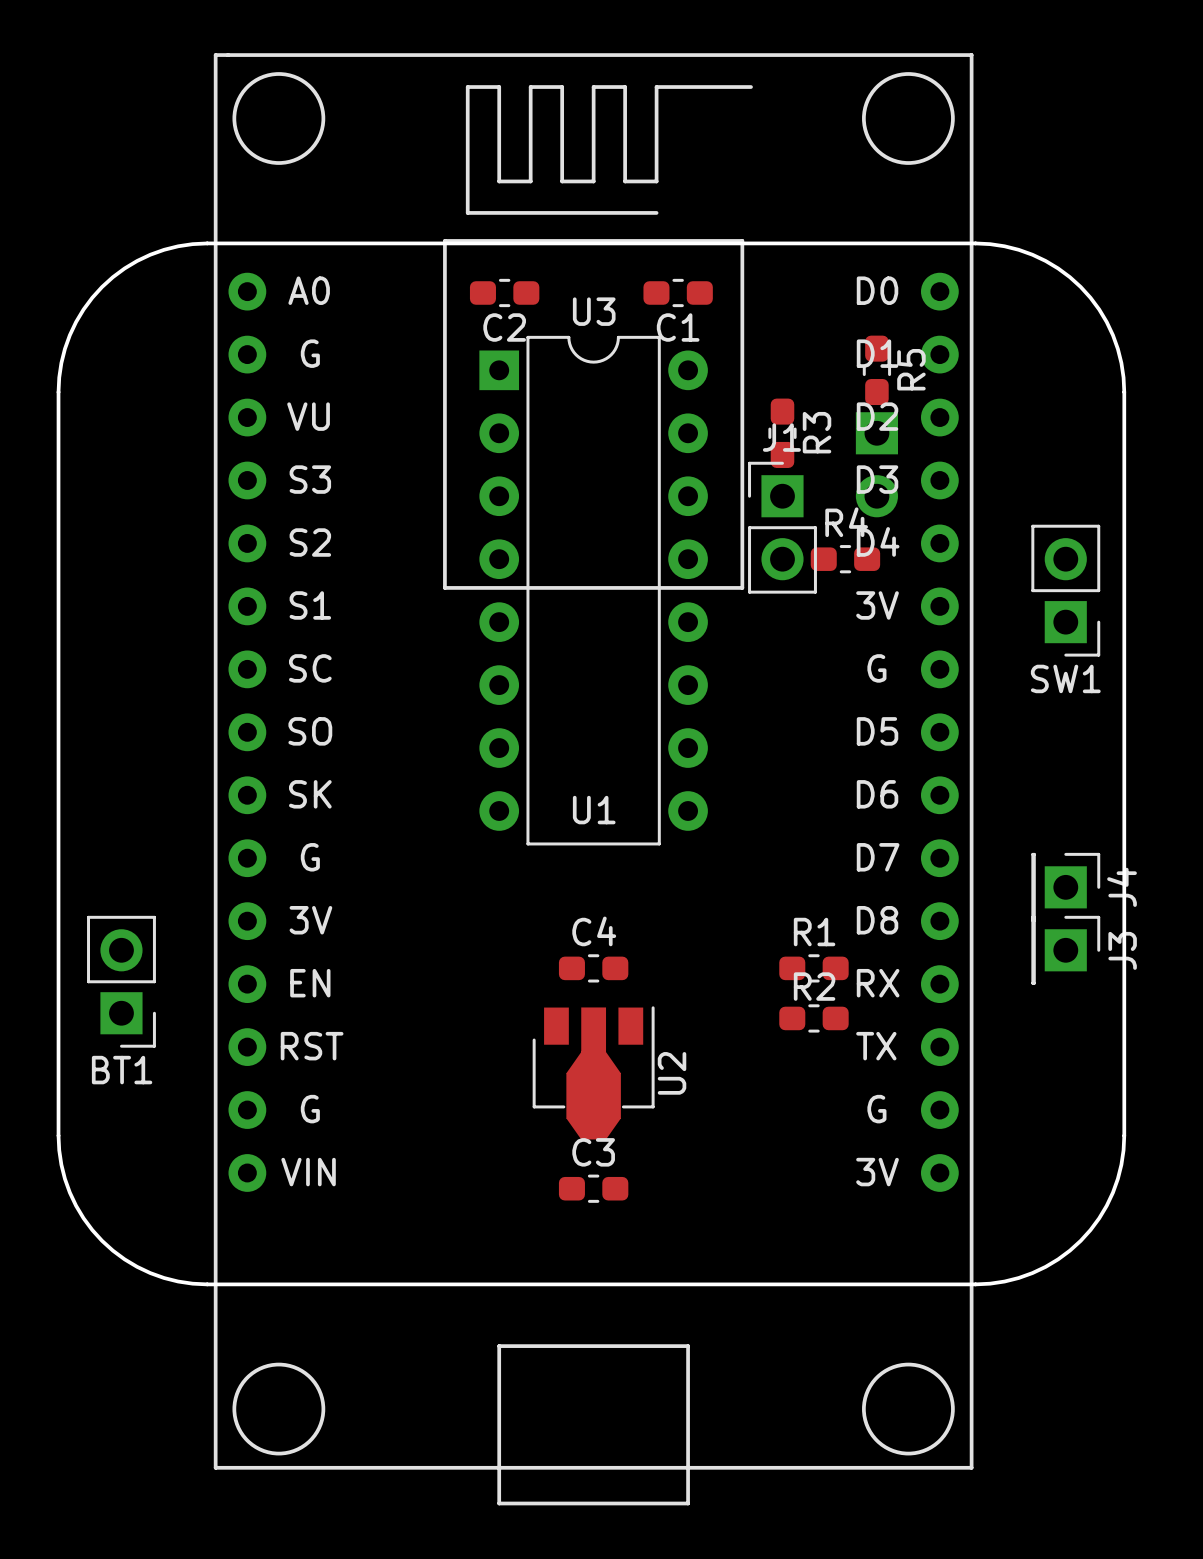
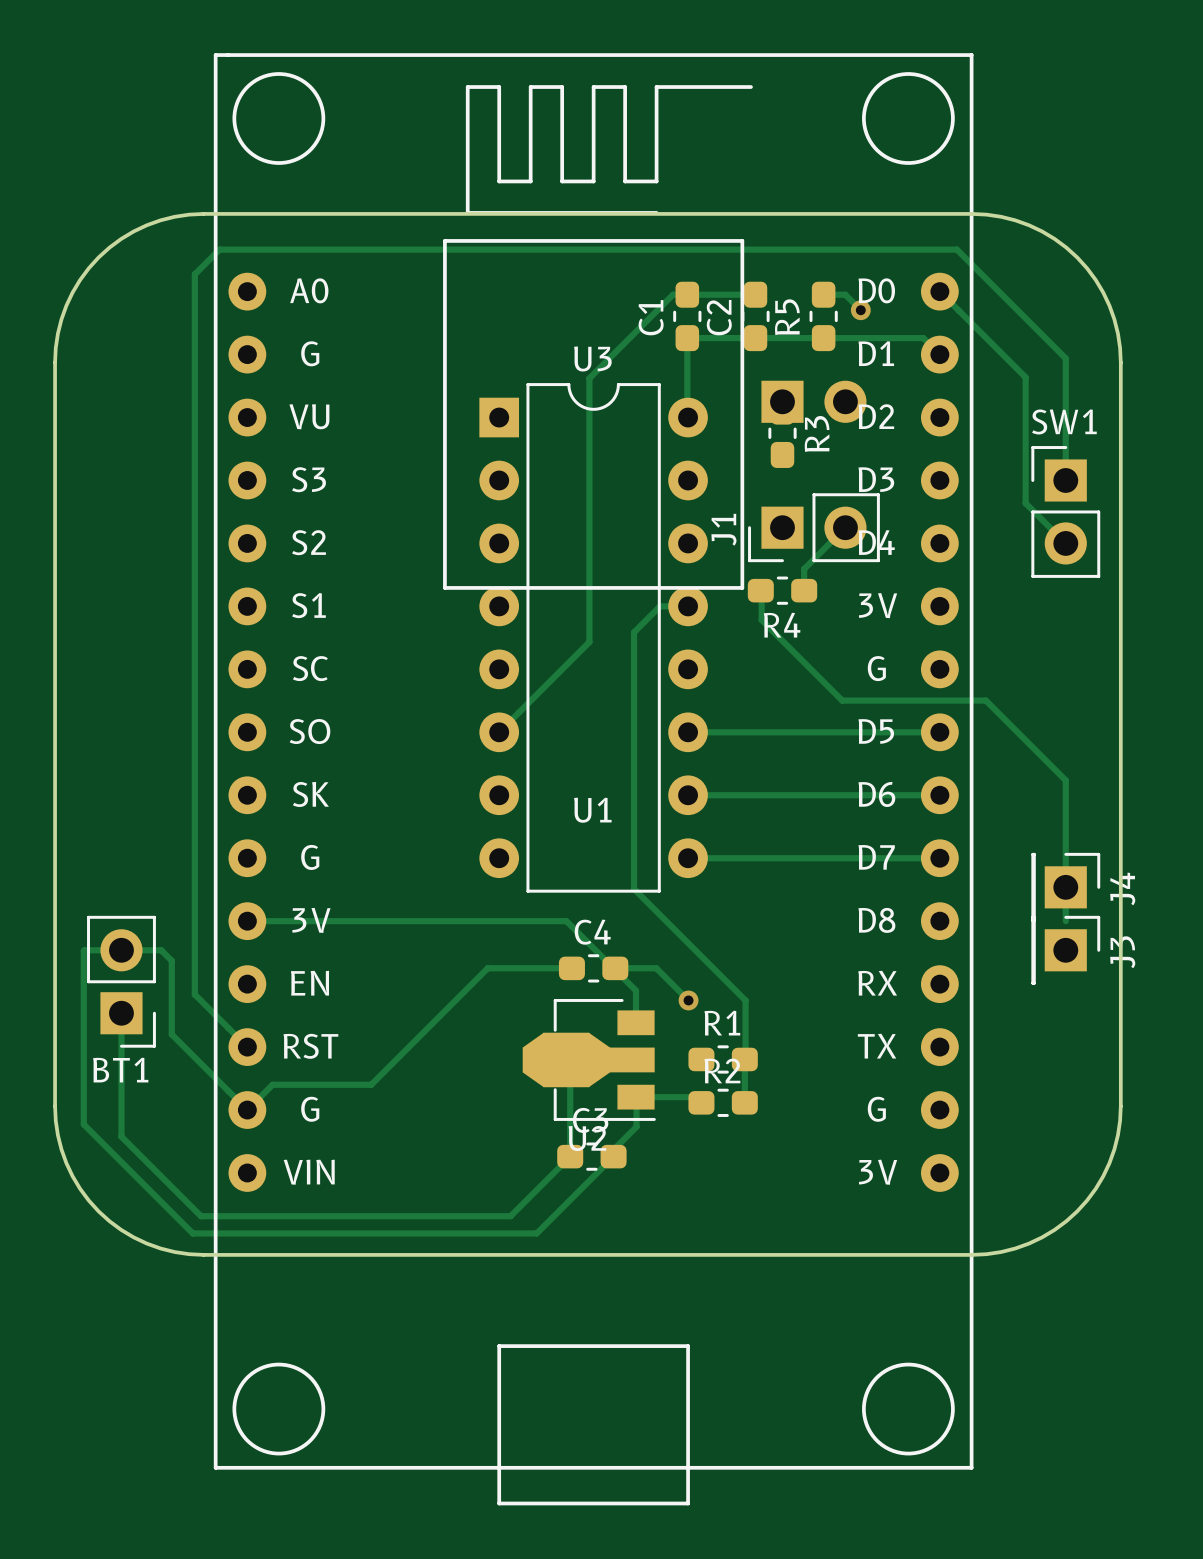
board edge: (207, 243) (990, 244) (1018, 249) (1045, 260) (1069, 277) (1090, 297) (1112, 335) (1121, 363) (1124, 392) (1124, 1135) (1121, 1164) (1112, 1192) (1090, 1230) (1069, 1250) (1045, 1266) (1018, 1277) (975, 1284) (207, 1284) (164, 1277) (137, 1266) (112, 1250) (92, 1230) (76, 1205) (64, 1178) (58, 1135) (59, 377) (69, 335) (83, 309) (102, 286) (124, 268) (150, 254) (178, 246) (207, 243) -> (203, 213) (986, 214) (1015, 220) (1042, 231) (1066, 247) (1087, 268) (1109, 305) (1117, 333) (1120, 362) (1120, 1106) (1117, 1135) (1109, 1163) (1087, 1200) (1066, 1221) (1042, 1237) (1015, 1248) (972, 1254) (203, 1254) (174, 1252) (133, 1237) (109, 1221) (88, 1200) (66, 1163) (57, 1135) (55, 1106) (55, 348) (66, 305) (80, 280) (98, 257) (121, 238) (146, 225) (174, 216) (203, 213)
track: none -> (939, 291) (1025, 377) (1025, 503) (1065, 543)
C2 rotation: 0° (504, 292) -> 90° clockwise (755, 316)
C2 position: (504, 292) -> (755, 316)
C1 rotation: 0° (678, 292) -> 90° clockwise (687, 316)
track: none -> (755, 294) (673, 294) (589, 378) (589, 642) (499, 732)
track: none -> (823, 294) (845, 294) (860, 310)
via: none -> (860, 310)
track: none -> (939, 354) (923, 338) (687, 338) (688, 417)
R5 name position: R5 (911, 369) -> R5 (787, 317)
R5 position: (876, 370) -> (823, 316)
part rotation: 0° (876, 464) -> 90° counterclockwise (813, 401)
part position: (876, 464) -> (813, 401)
track: none -> (1065, 480) (1065, 358) (956, 249) (219, 249) (194, 274) (194, 994) (247, 1047)
R4 name position: R4 (846, 522) -> R4 (782, 625)
J1 rotation: 0° (782, 527) -> 90° counterclockwise (813, 527)
track: none -> (845, 527) (804, 568) (804, 590)
R4 position: (845, 559) -> (782, 590)
U3 position: (593, 590) -> (593, 637)
track: none -> (760, 590) (761, 620) (842, 700) (985, 700) (1065, 780) (1065, 921)
SW1 rotation: 0° (1065, 590) -> 180° (1065, 511)
track: none -> (688, 606) (660, 606) (634, 632) (634, 888) (745, 1000) (744, 1102)
track: none -> (688, 732) (939, 732)
track: none -> (688, 795) (939, 795)
track: none -> (688, 858) (939, 858)
track: none -> (247, 921) (566, 921) (636, 990) (636, 1022)
track: none -> (570, 968) (487, 968) (371, 1084) (272, 1084) (247, 1110) (171, 1034) (171, 960) (161, 950) (84, 950) (83, 1124) (192, 1233) (536, 1233) (613, 1156) (613, 1149) (636, 1126) (636, 1097) (695, 1097) (701, 1102)
track: none -> (613, 968) (656, 968) (688, 1000)
R1 position: (813, 968) -> (723, 1059)
via: none -> (688, 1000)
track: none -> (121, 1013) (121, 1136) (201, 1216) (510, 1216) (570, 1156) (570, 1063) (566, 1059)
R2 position: (813, 1018) -> (723, 1102)
U2 rotation: 0° (593, 1072) -> 90° clockwise (589, 1059)
C3 position: (593, 1188) -> (591, 1156)

